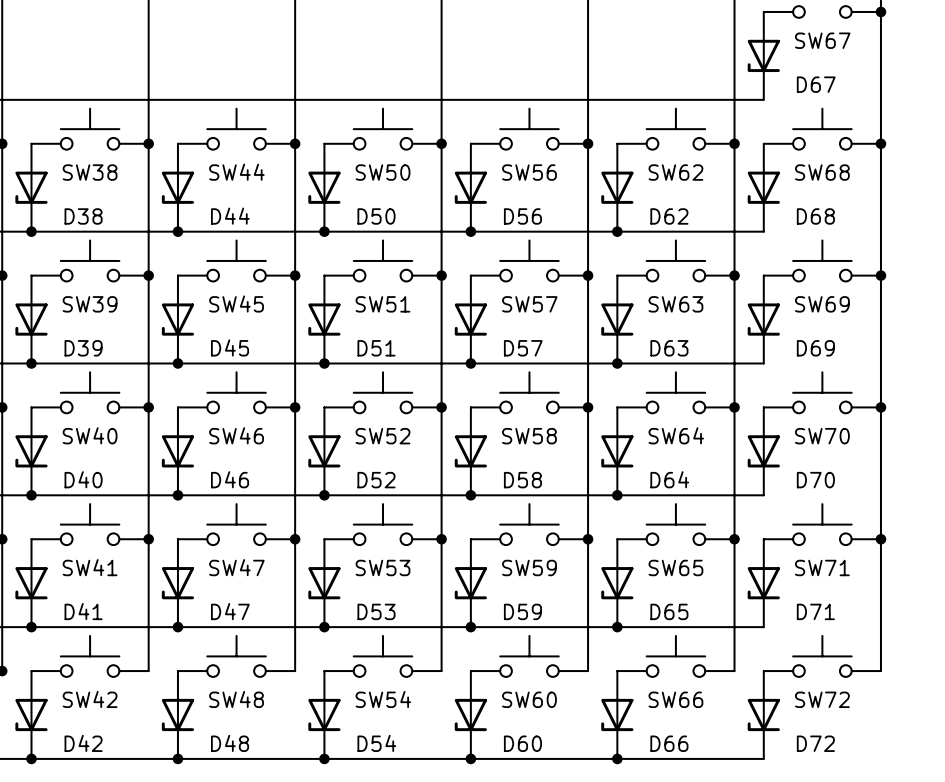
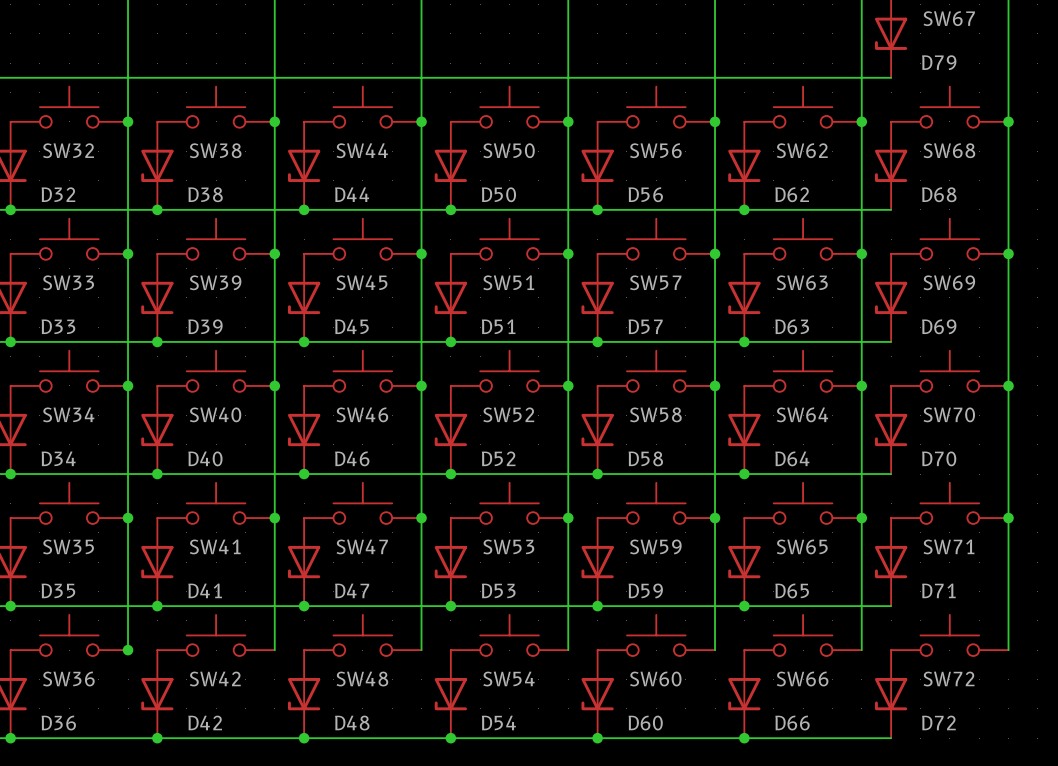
D67 name: D67 (816, 84) -> D79 (939, 62)

